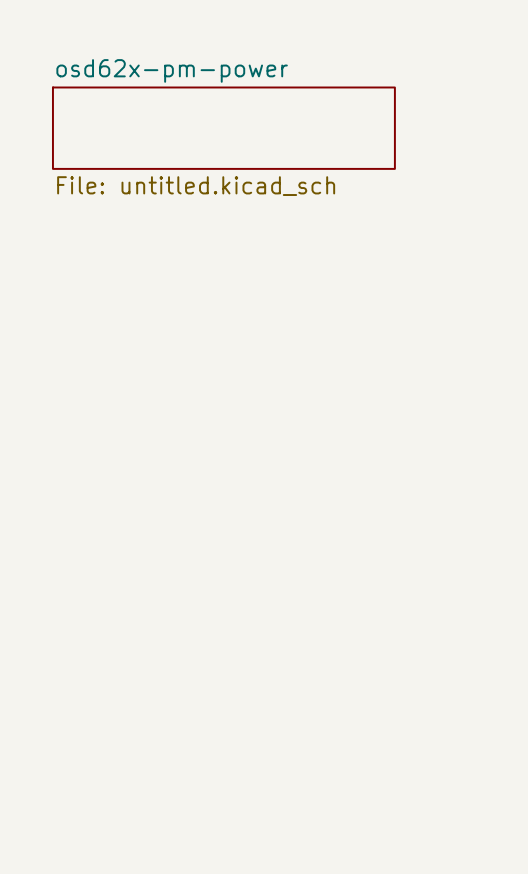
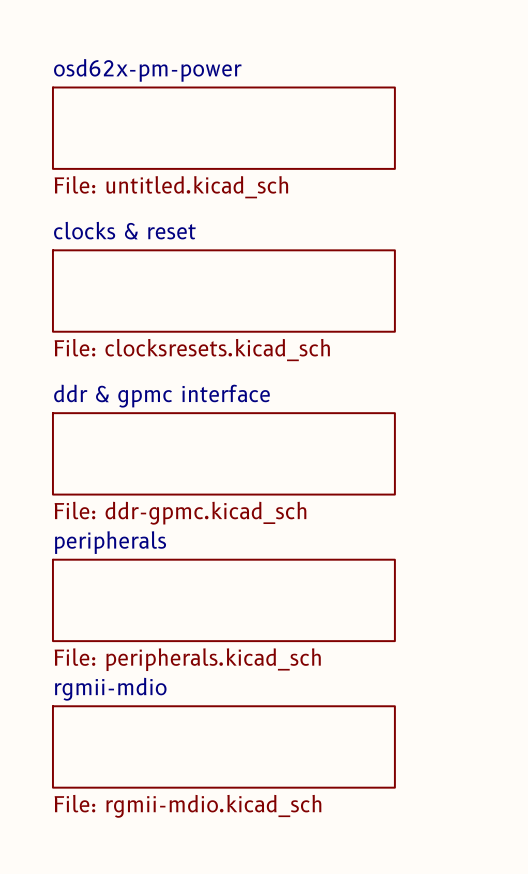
sheet clocks & reset: none -> File: clocksresets.kicad_sch (223, 291)
sheet ddr & gpmc interface: none -> File: ddr-gpmc.kicad_sch (223, 453)
sheet peripherals: none -> File: peripherals.kicad_sch (223, 600)
sheet rgmii-mdio: none -> File: rgmii-mdio.kicad_sch (223, 746)

